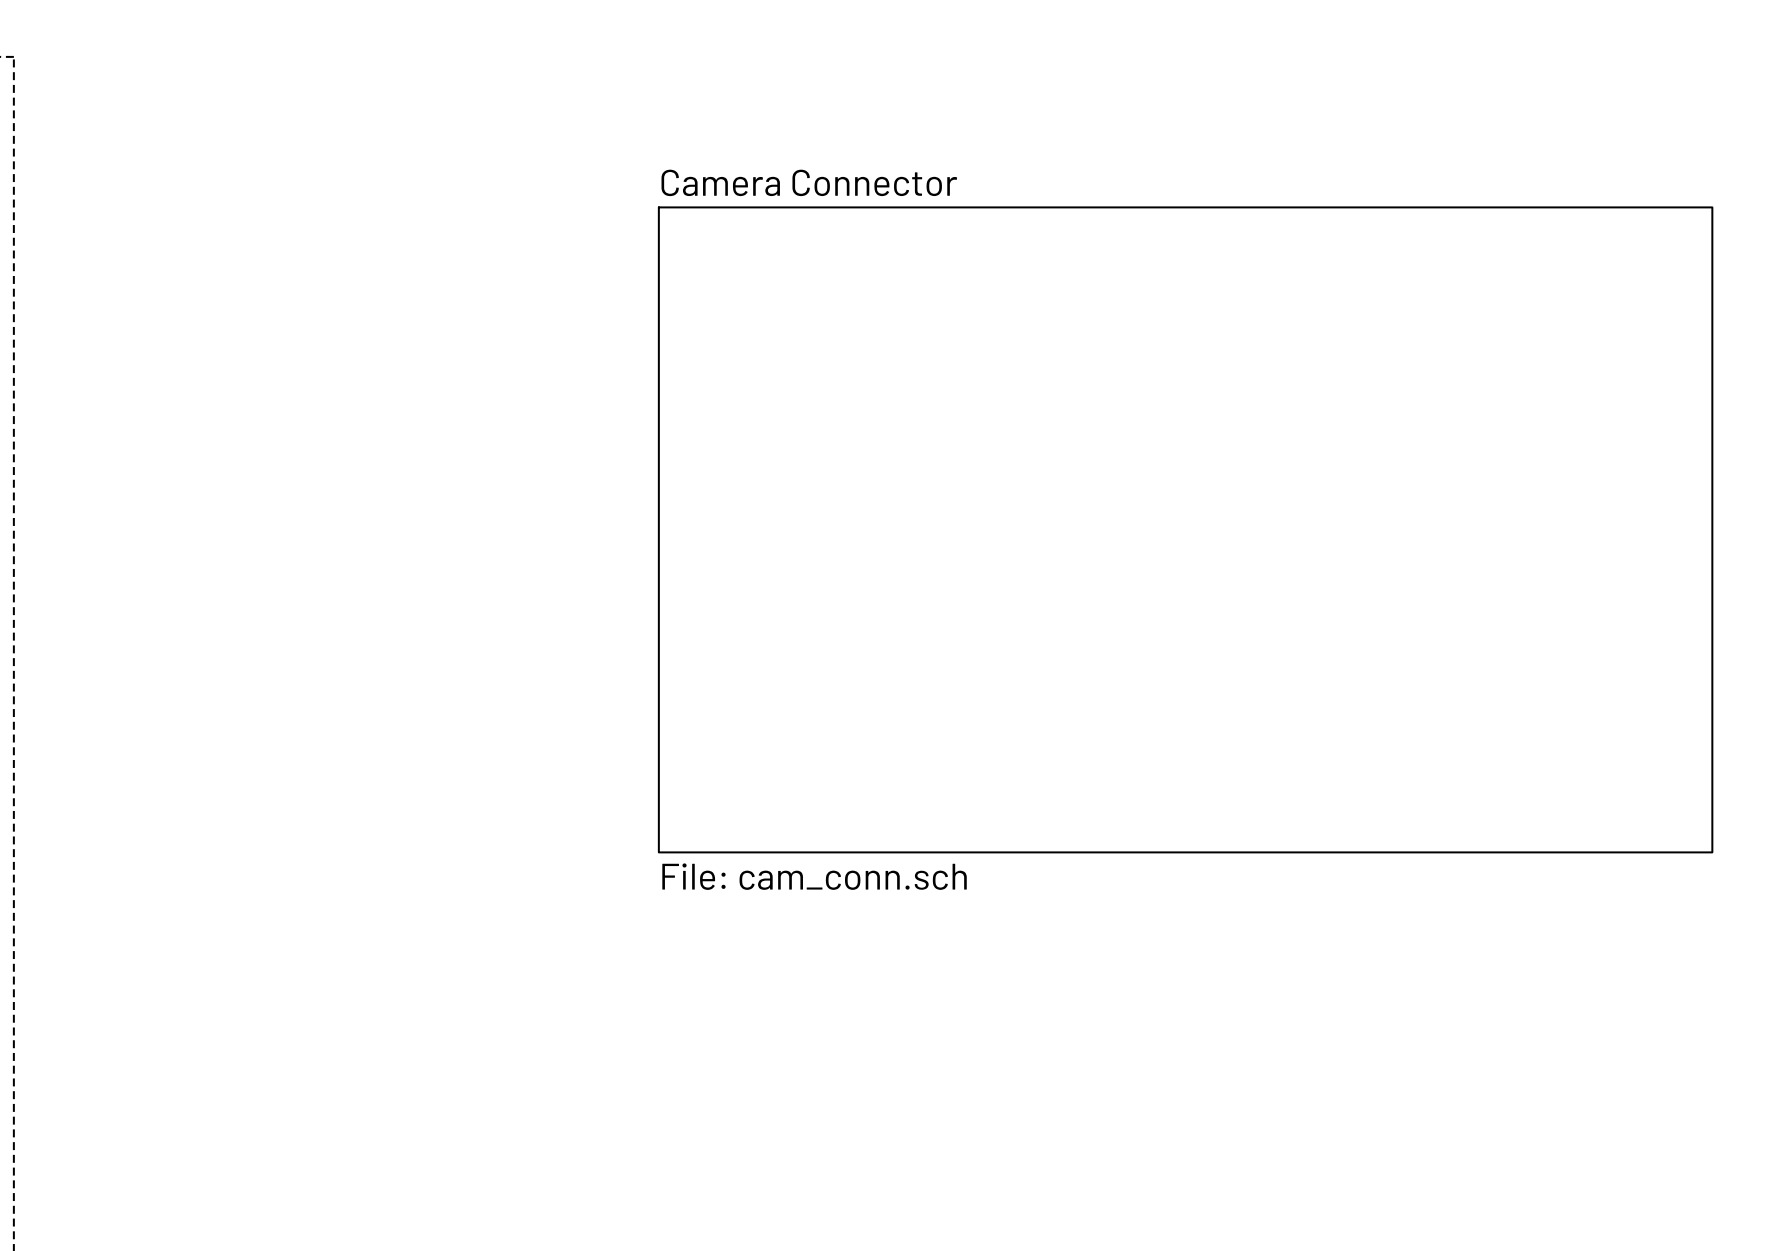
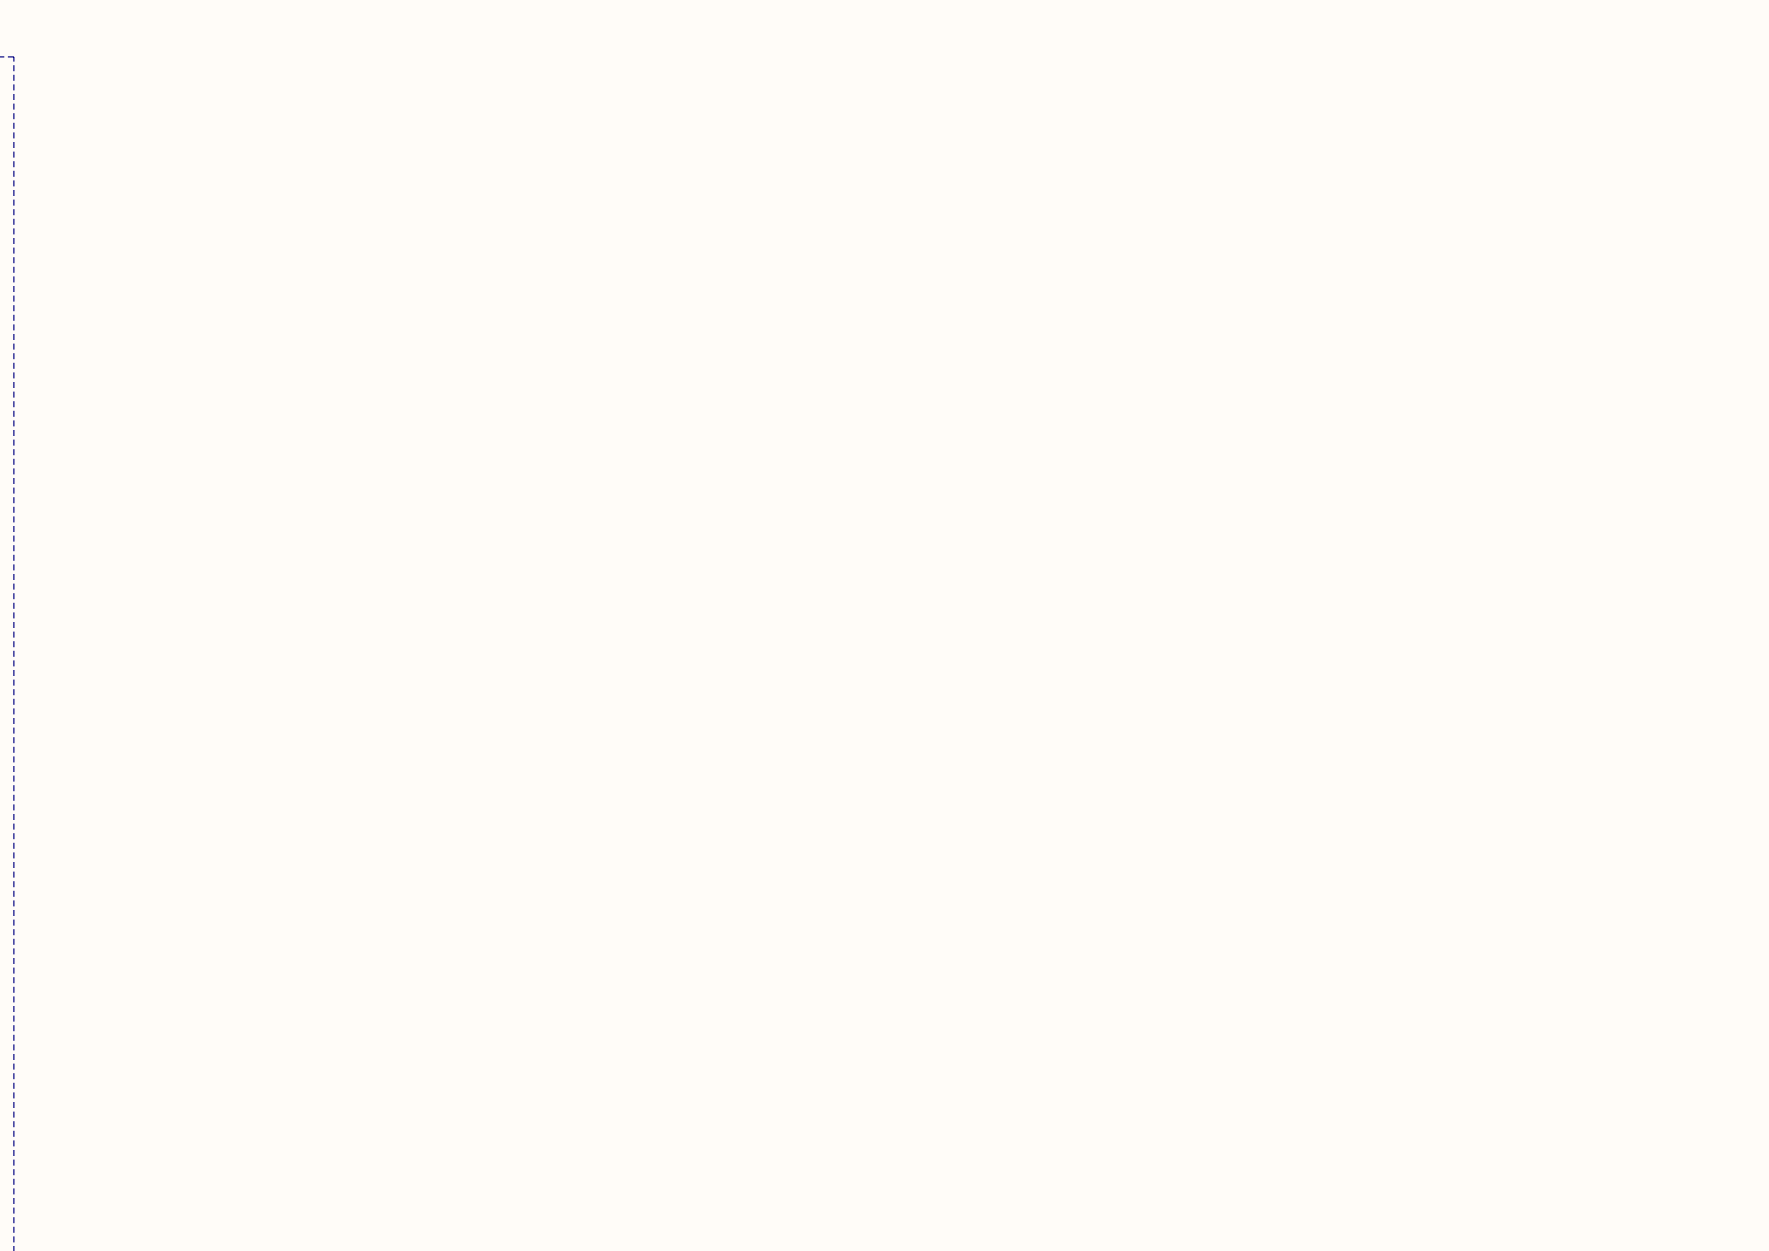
sheet Camera Connector: File: cam_conn.sch (1185, 529) -> none

